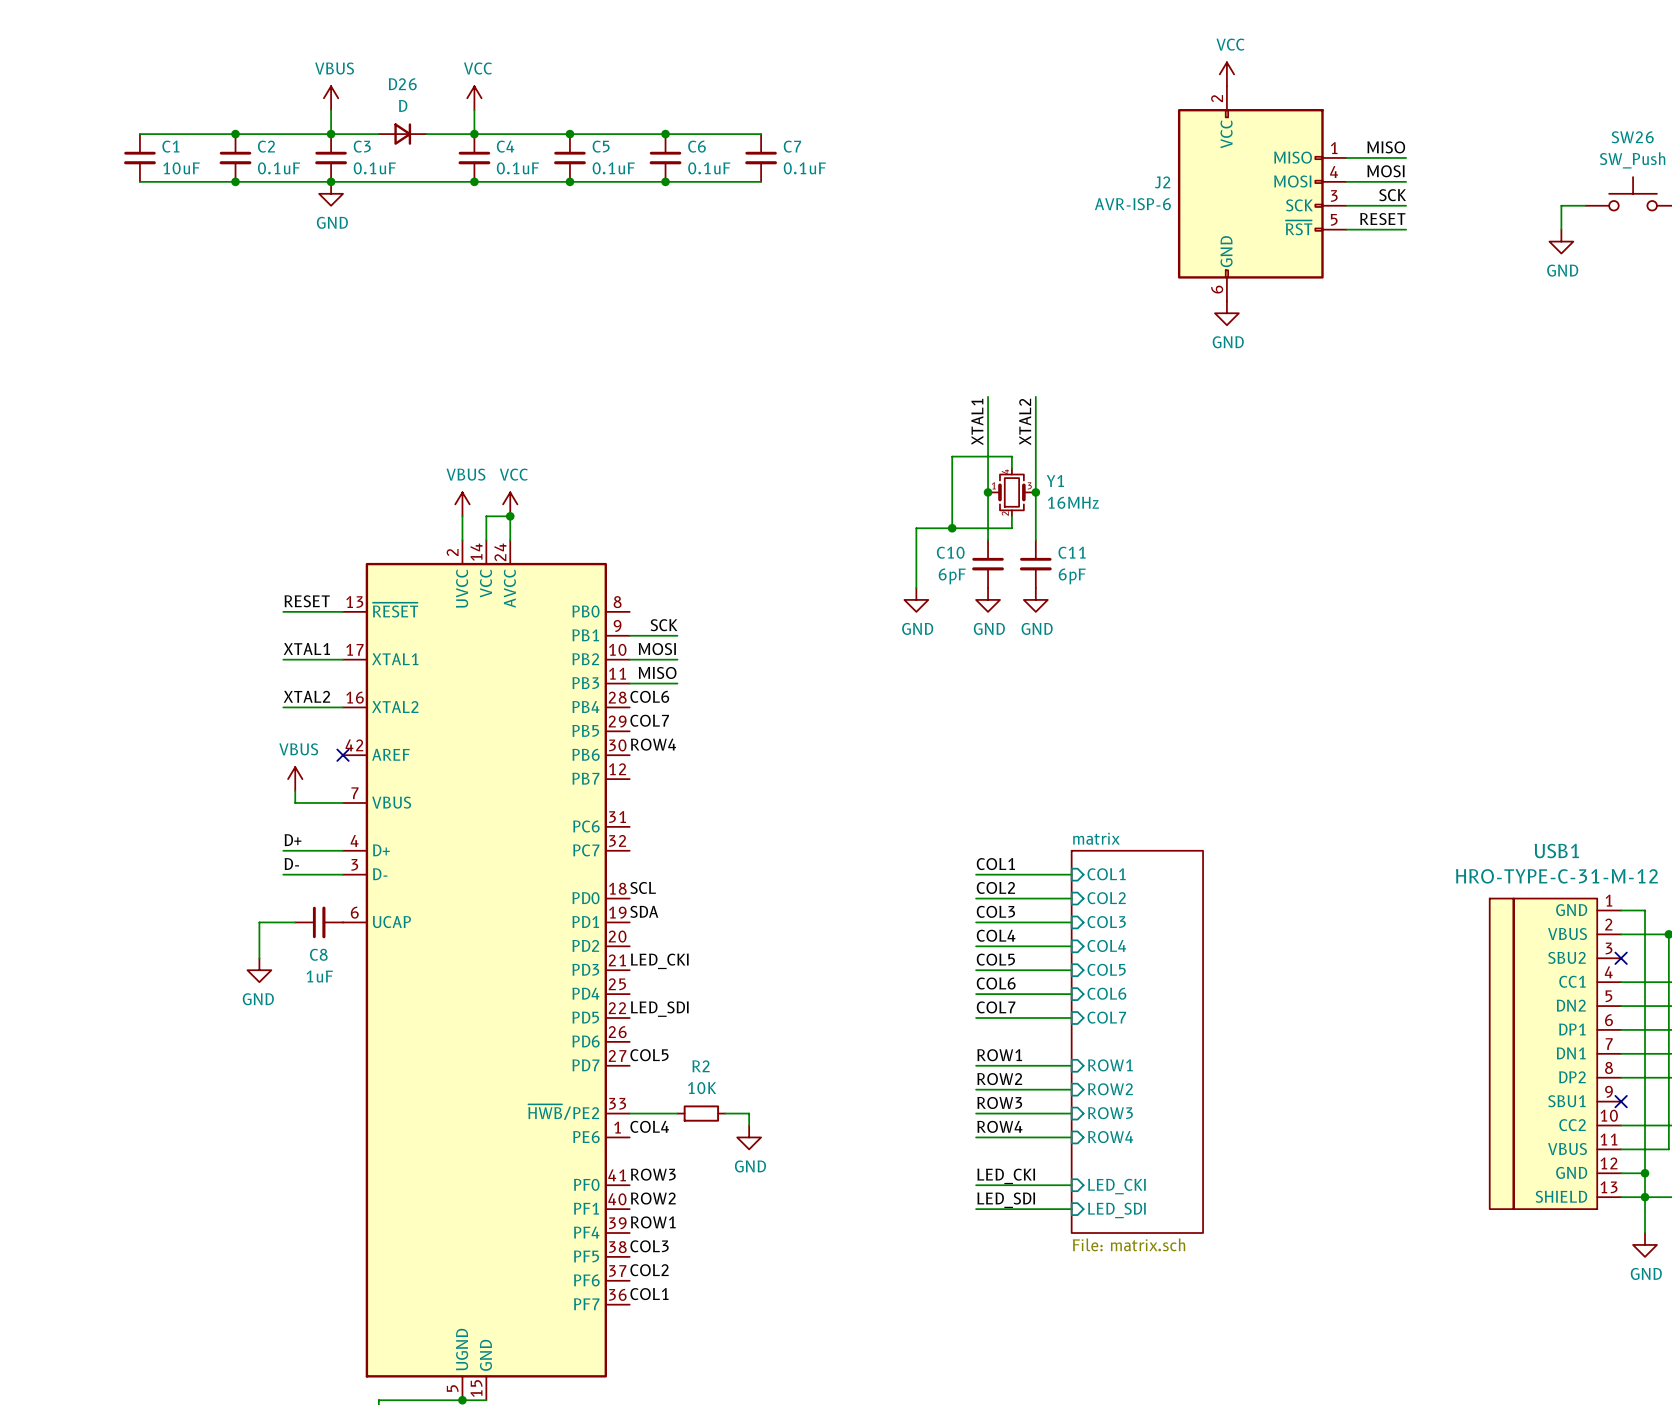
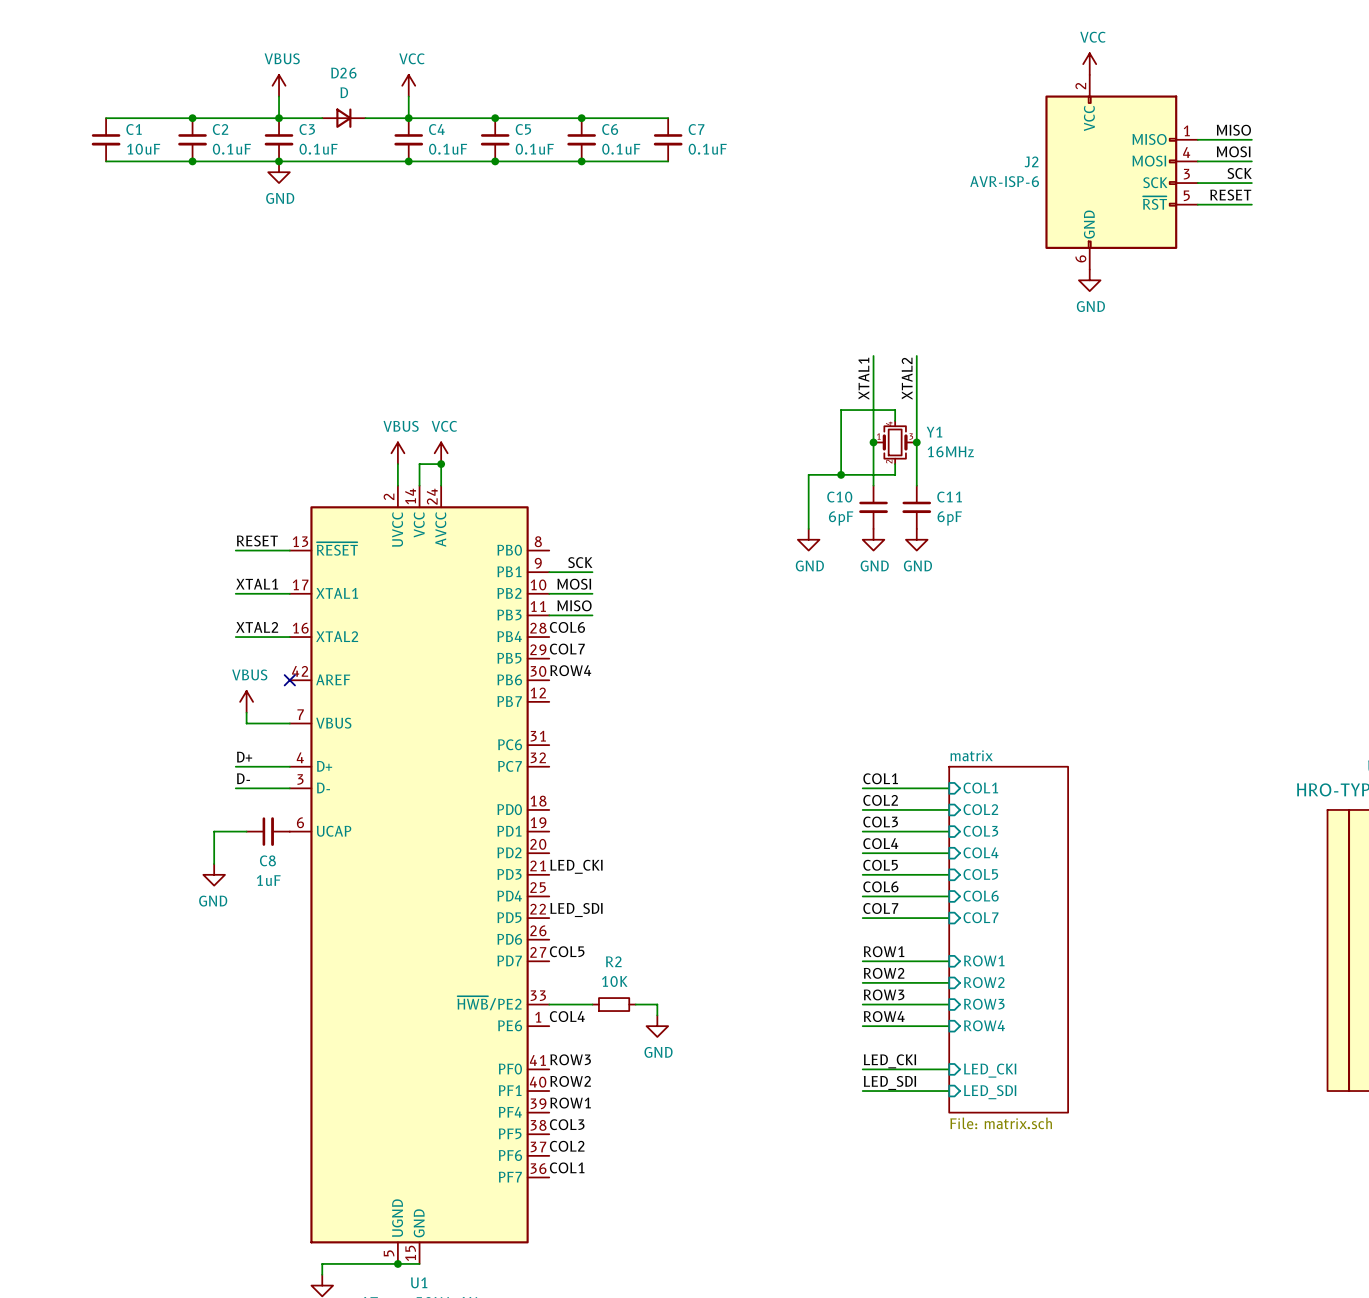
label: SCL (643, 887) -> none
label: SDA (644, 911) -> none

